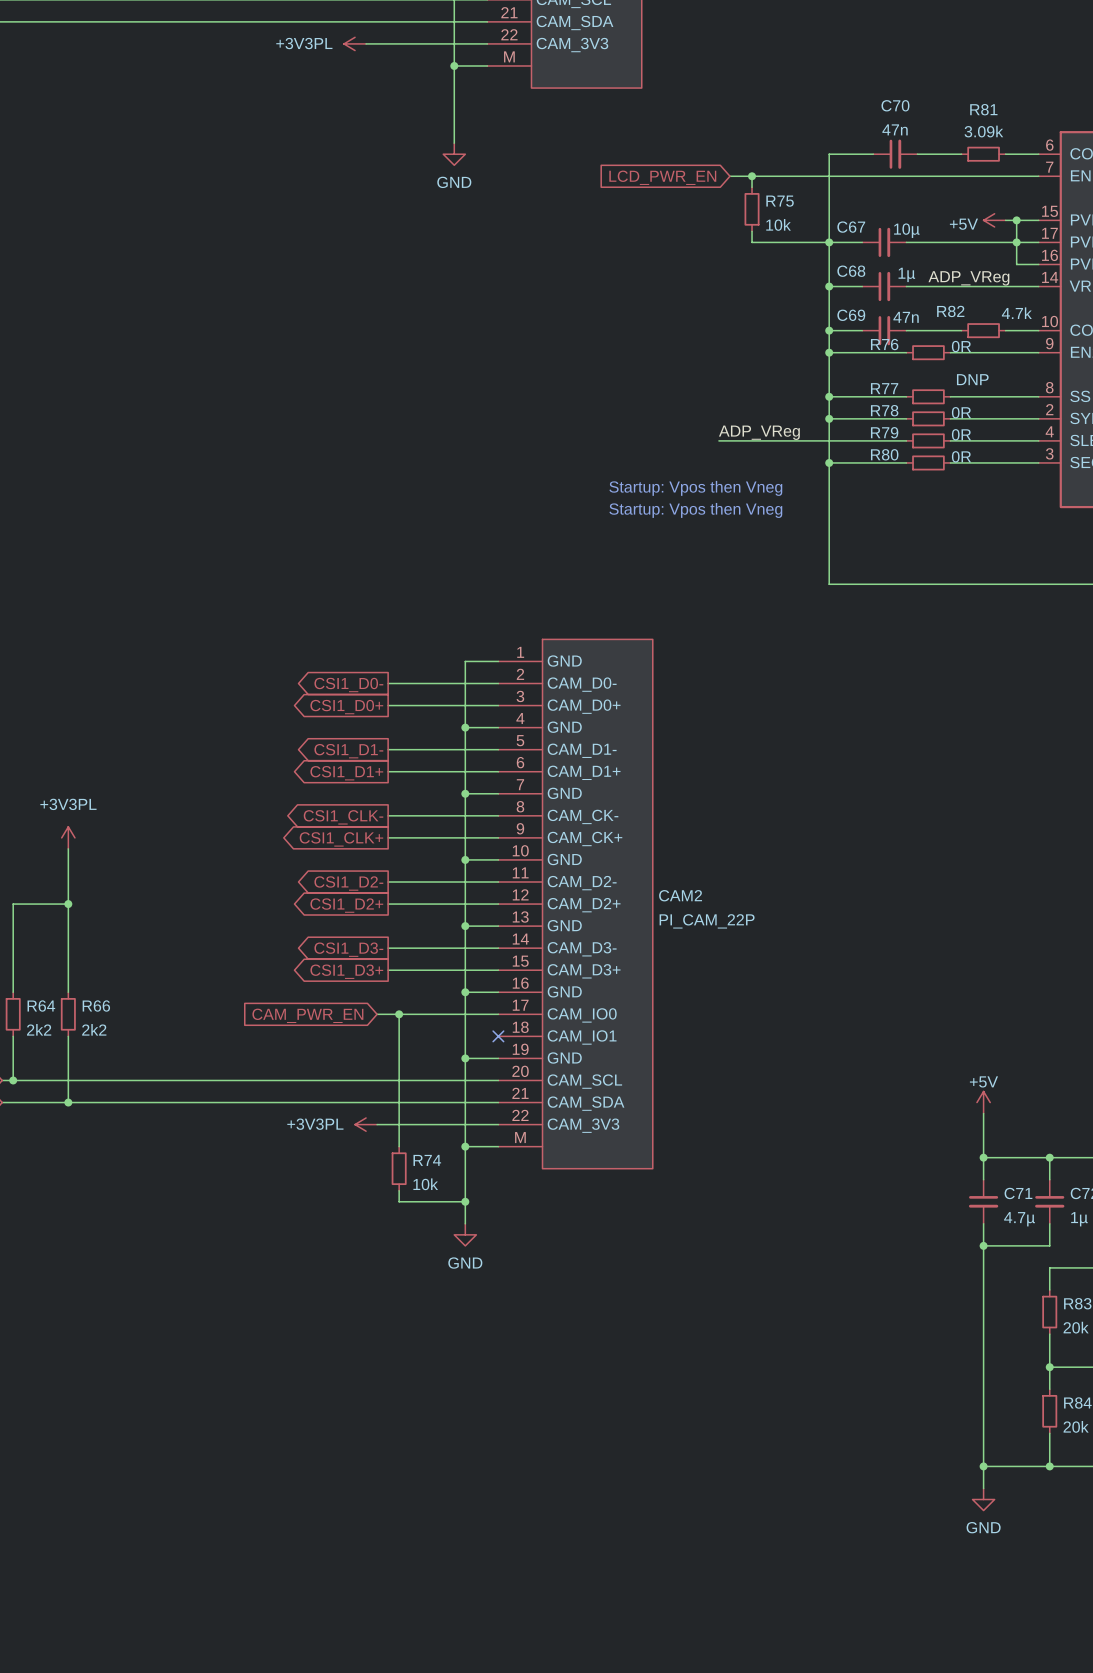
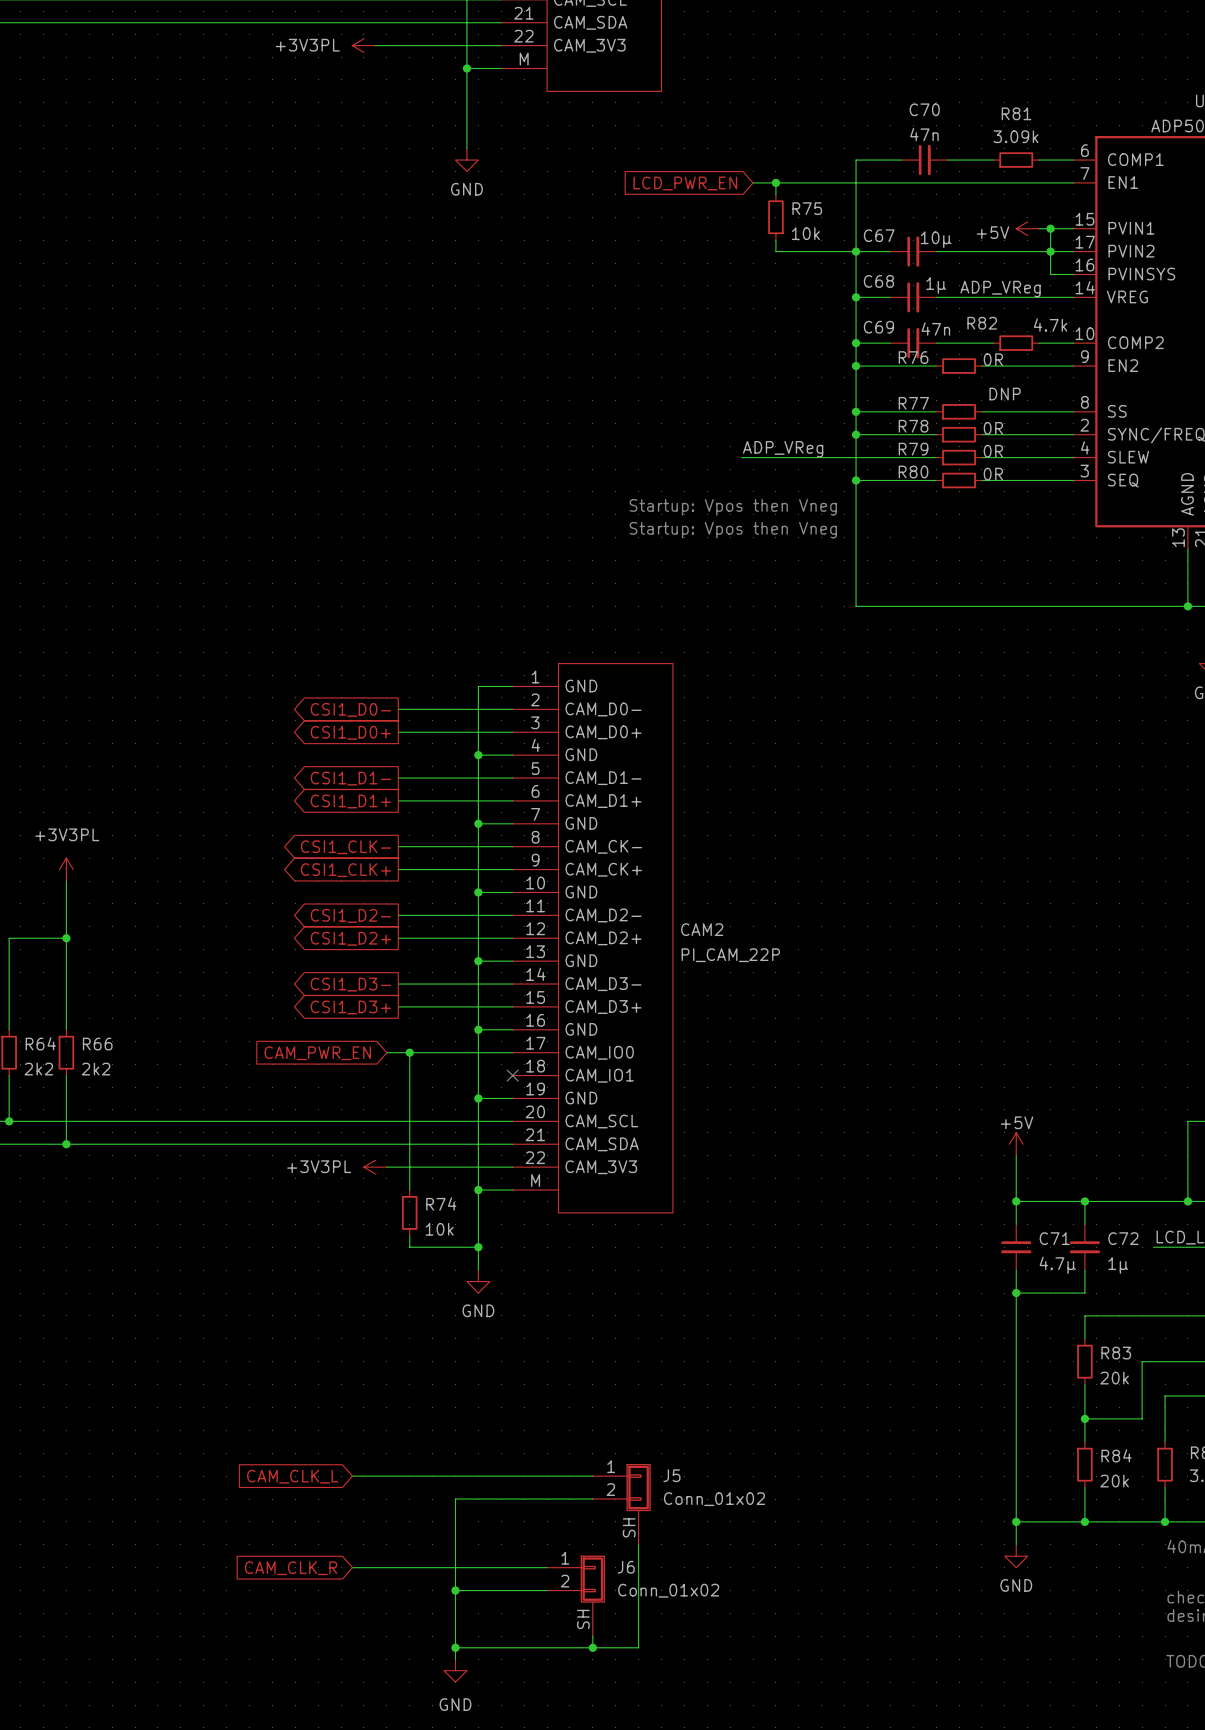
wire: none -> (352, 1476) (592, 1476)
global label: none -> CAM_CLK_L (292, 1476)
wire: none -> (592, 1499) (455, 1499) (455, 1659)
J5: none -> Conn_01x02 (621, 1504)
wire: none -> (638, 1544) (638, 1647) (455, 1647)
wire: none -> (352, 1567) (547, 1567)
global label: none -> CAM_CLK_R (291, 1568)
wire: none -> (455, 1590) (547, 1590)
junction: none -> (455, 1590)
J6: none -> Conn_01x02 (576, 1595)
wire: none -> (592, 1636) (592, 1647)
junction: none -> (455, 1647)
junction: none -> (592, 1647)
power symbol: none -> GND (455, 1670)

